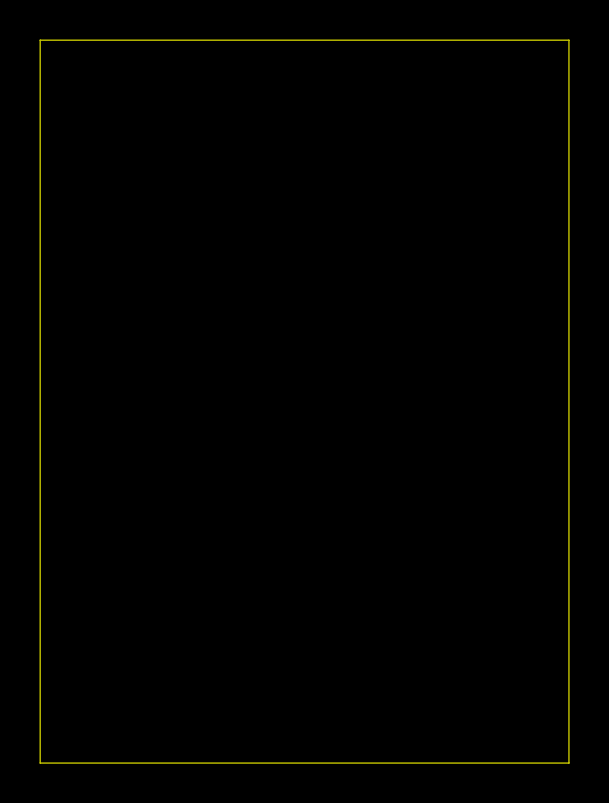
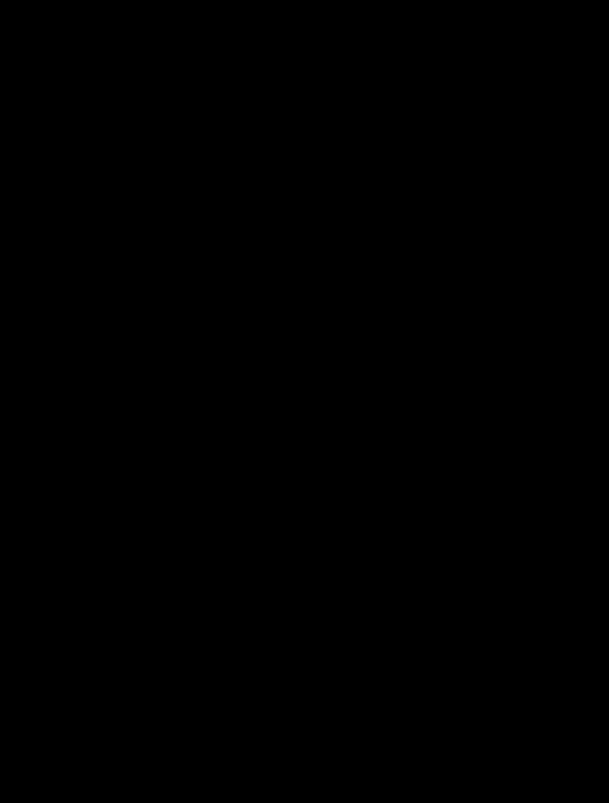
board edge: (40, 40) (568, 40) (568, 763) (40, 763) (40, 40) -> none

